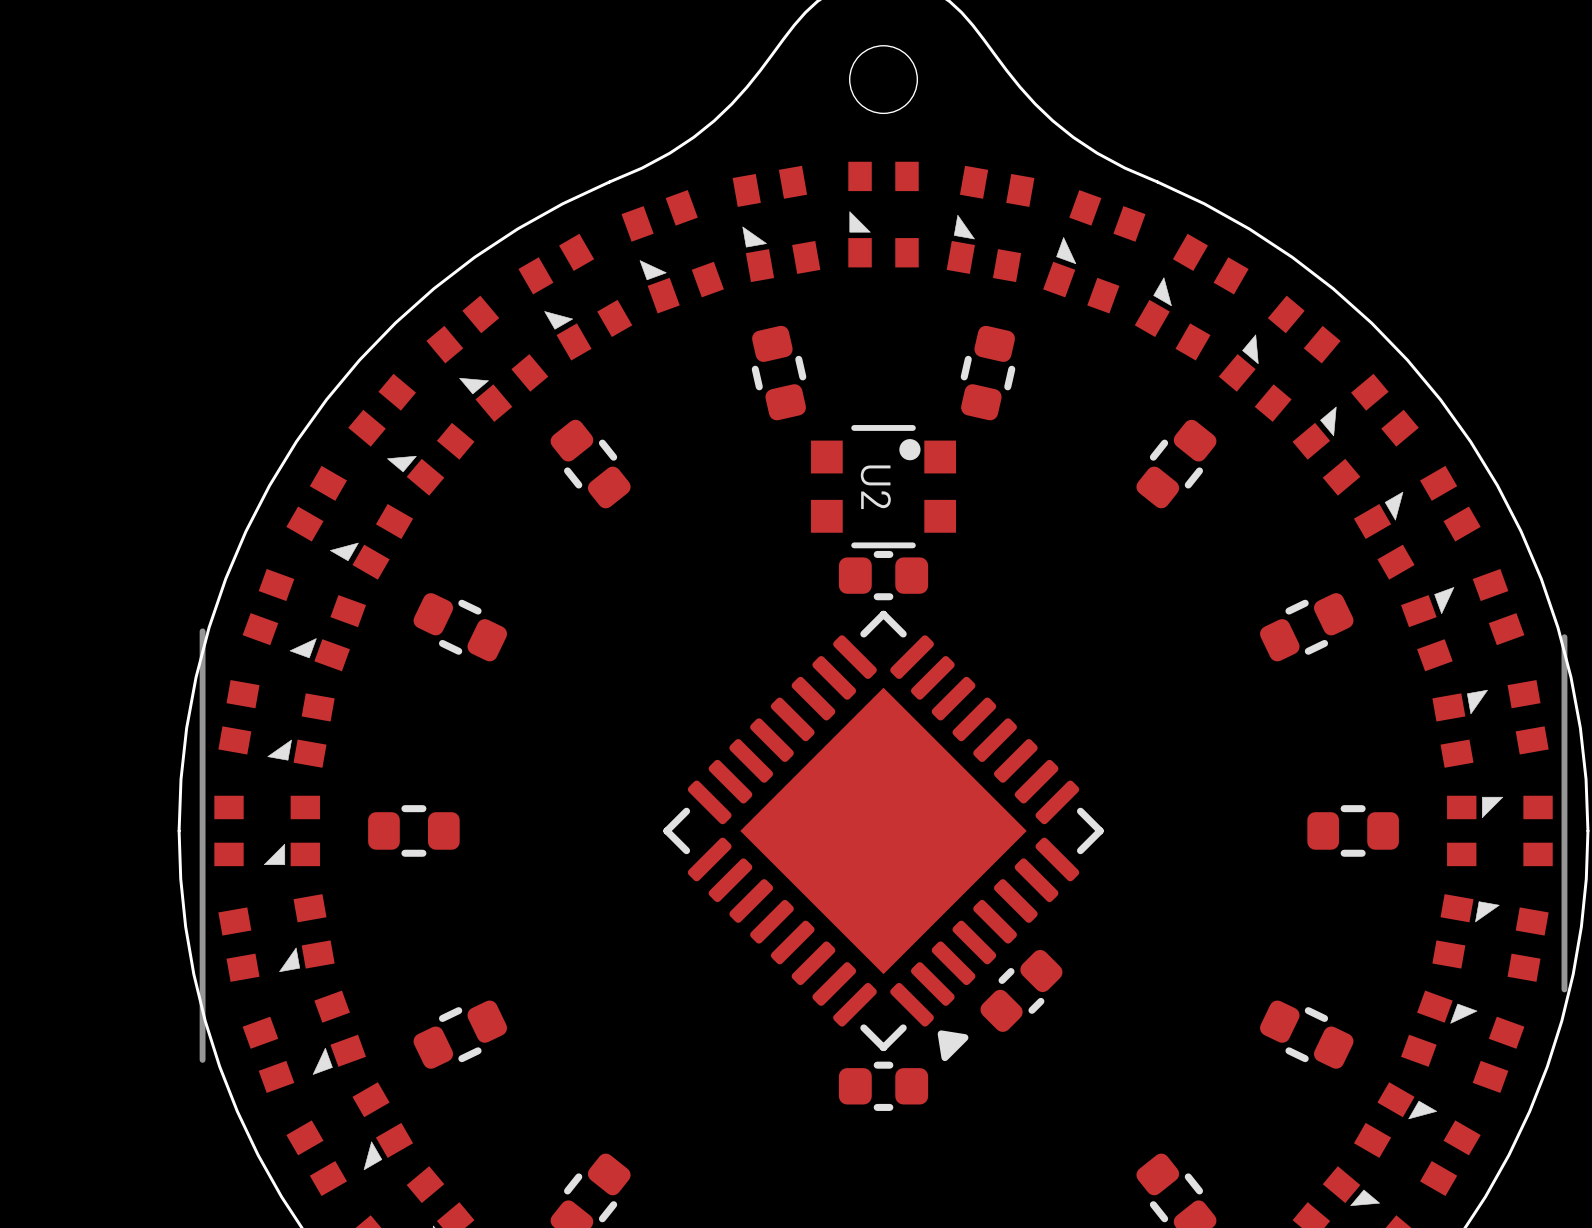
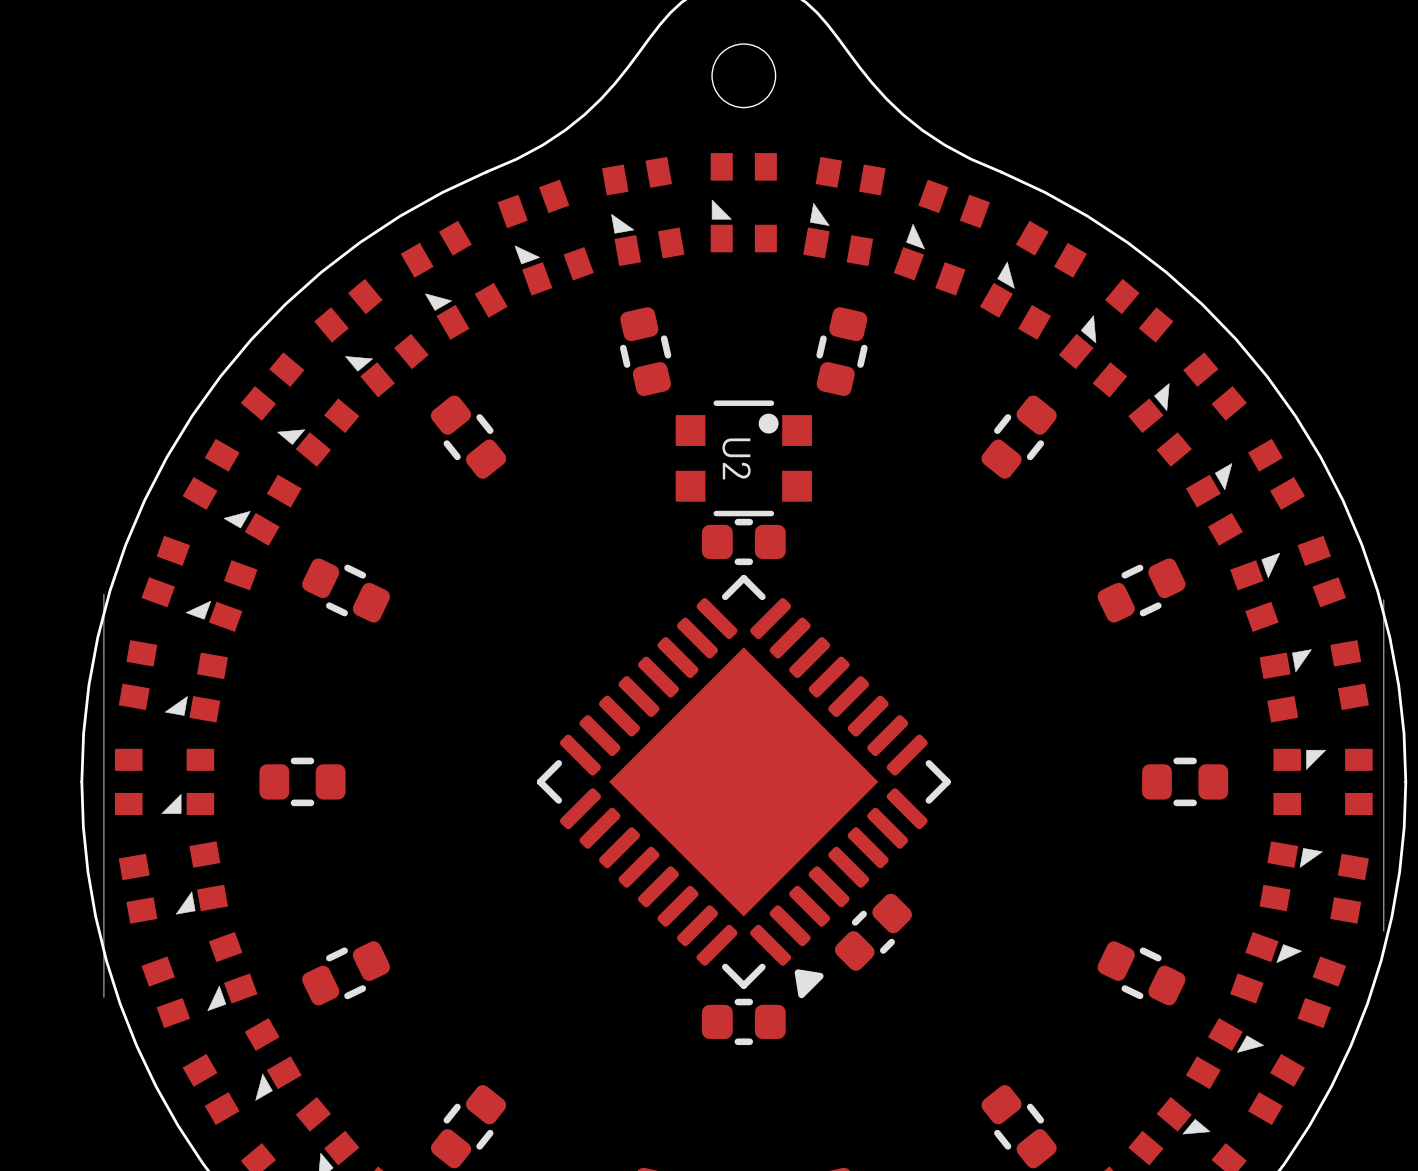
line width: thick (202, 631) (202, 1059) -> thin (103, 594) (103, 997)
line width: thick (1564, 637) (1564, 989) -> thin (1383, 599) (1383, 930)

